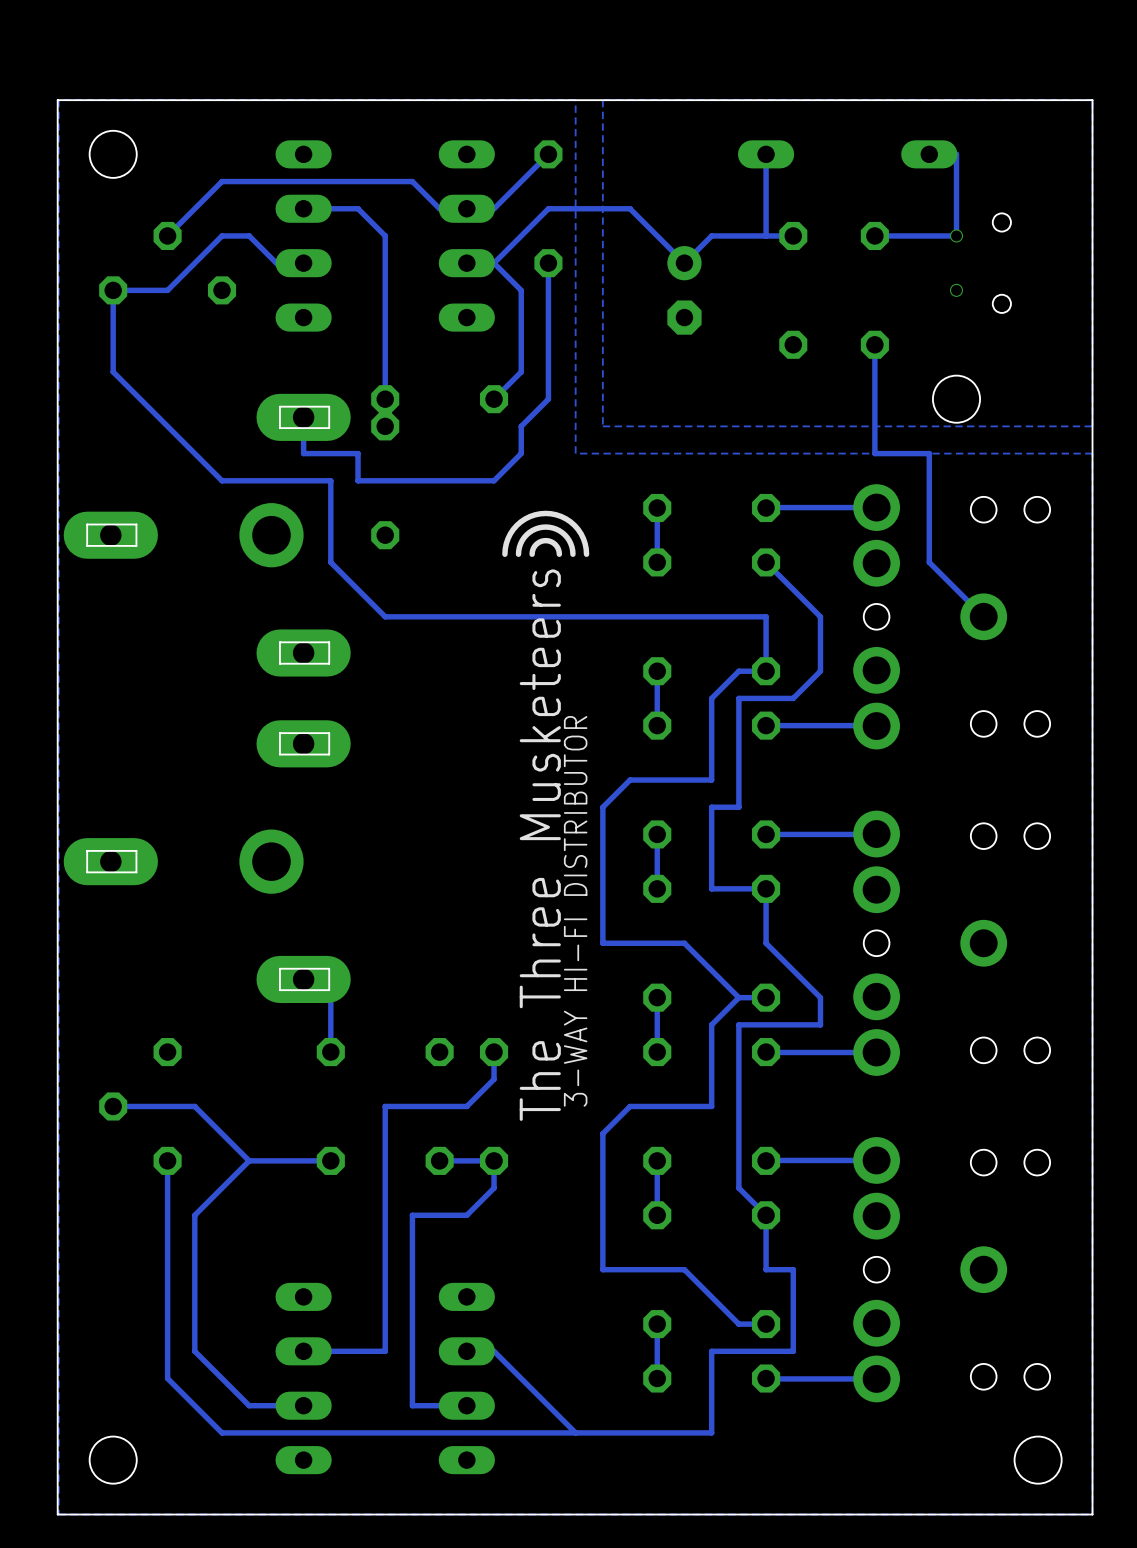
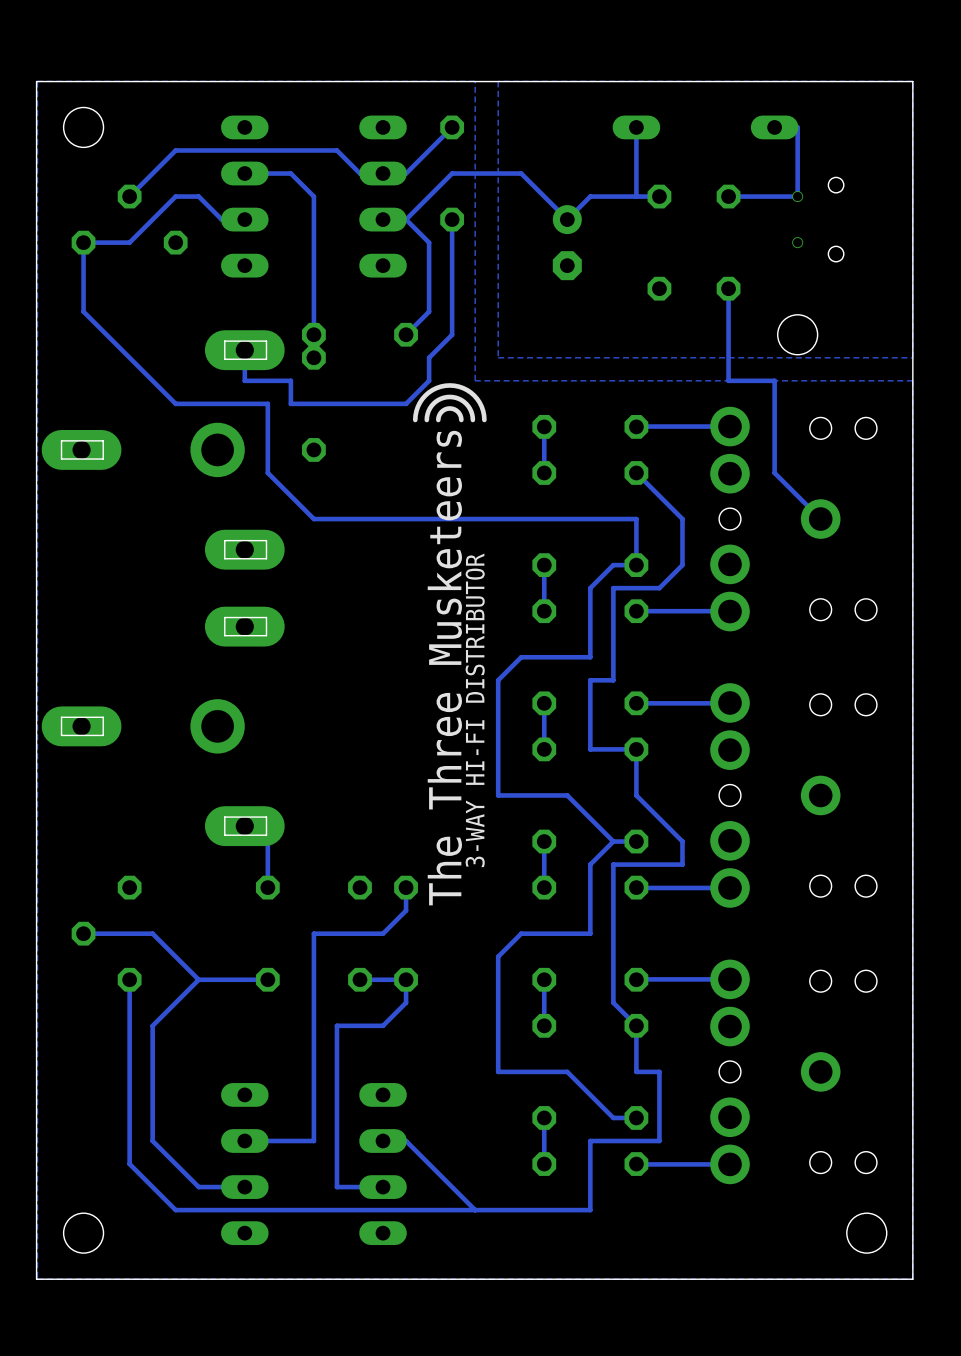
line: (559, 554) (555, 544) (545, 540) (536, 544) (532, 554) -> (461, 419) (457, 411) (449, 408) (441, 411) (438, 419)
line: (572, 554) (570, 543) (564, 535) (556, 529) (545, 527) (535, 529) (526, 535) (520, 543) (518, 554) -> (472, 419) (471, 411) (466, 403) (458, 398) (449, 396) (441, 398) (433, 403) (428, 411) (426, 419)
line: (586, 554) (583, 538) (574, 525) (561, 516) (545, 513) (530, 516) (516, 525) (508, 538) (504, 554) -> (484, 419) (481, 406) (474, 395) (463, 388) (449, 385) (436, 388) (425, 395) (417, 406) (415, 419)
text position: The Three Musketeers (540, 845) -> The Three Musketeers (444, 668)
text position: 3-WAY HI-FI DISTRIBUTOR (575, 911) -> 3-WAY HI-FI DISTRIBUTOR (475, 710)

